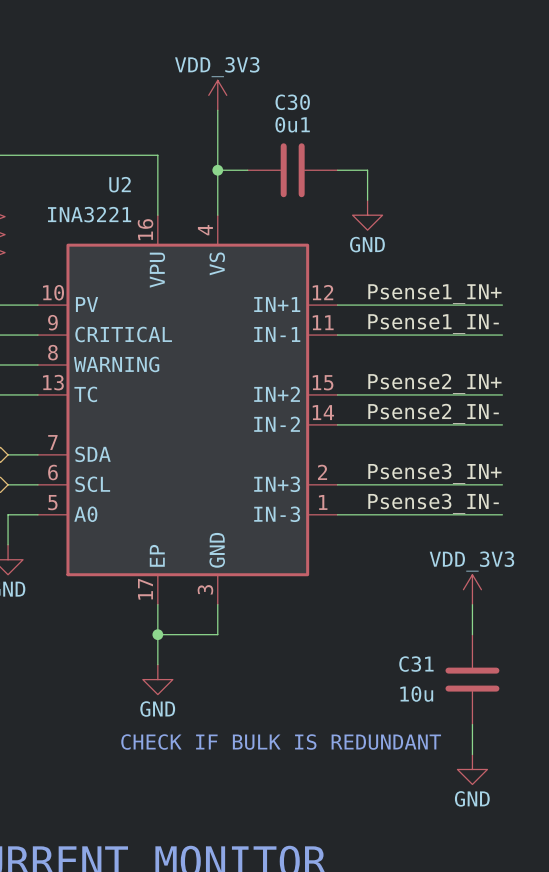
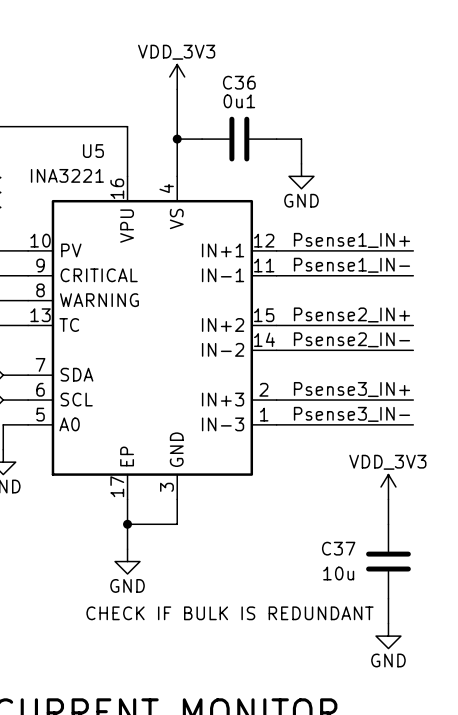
C30 name: C30 (292, 102) -> C36 (239, 82)
U2 name: U2 (120, 184) -> U5 (93, 151)
C31 name: C31 (416, 664) -> C37 (338, 548)

